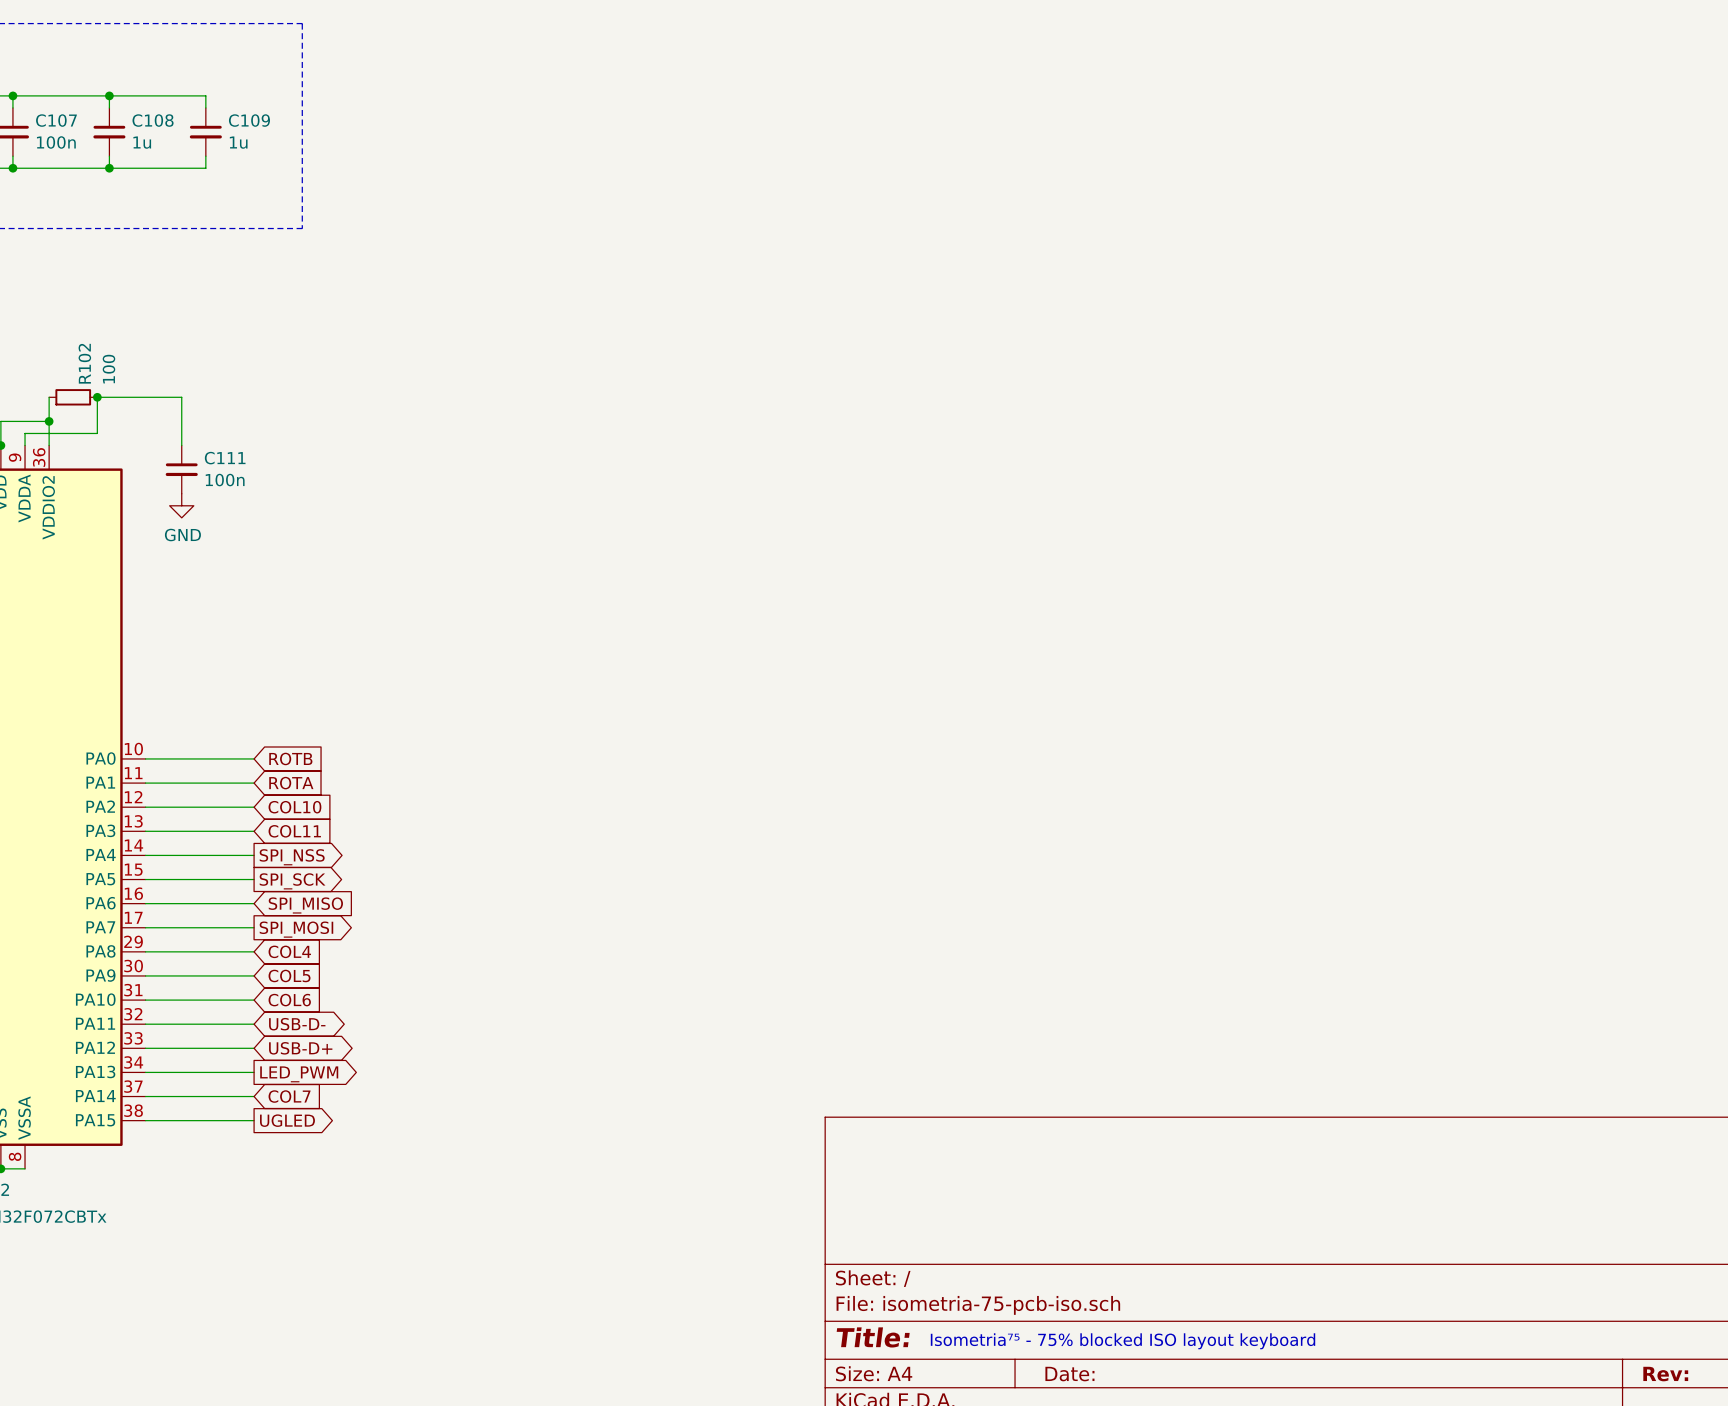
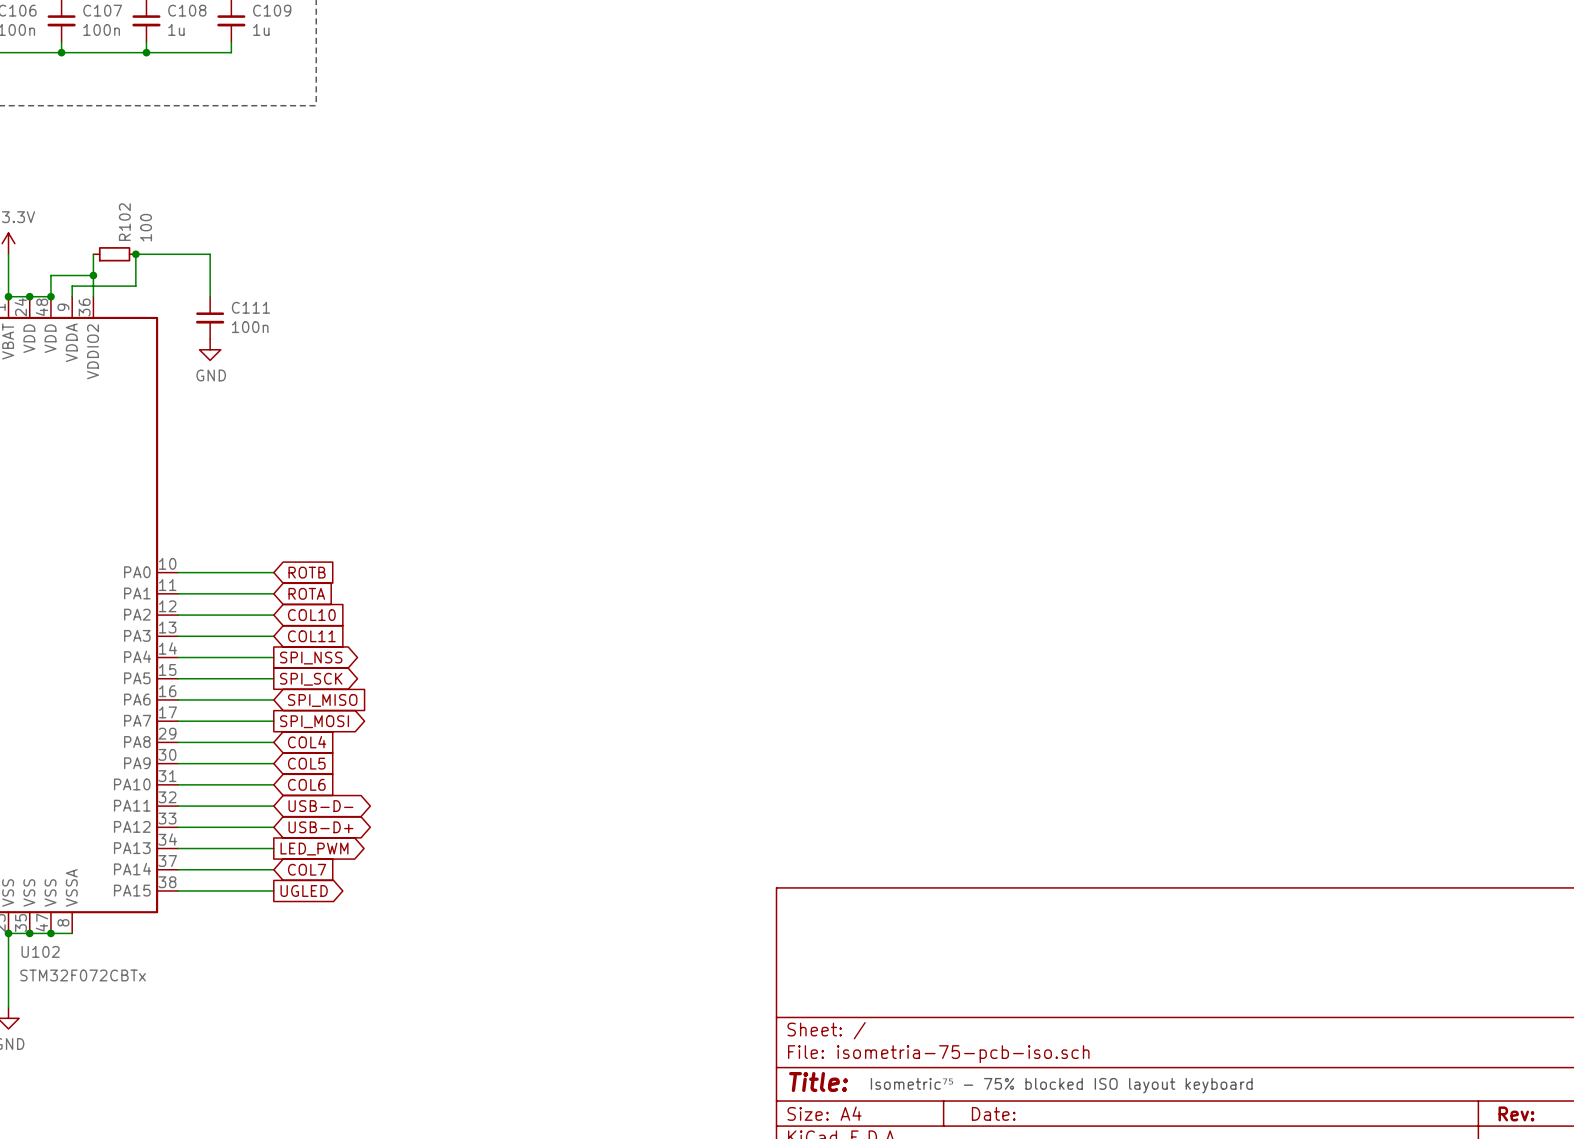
text: Isometria⁷⁵ - 75% blocked ISO layout keyboard (1123, 1341) -> Isometric⁷⁵ - 75% blocked ISO layout keyboard (1061, 1085)

